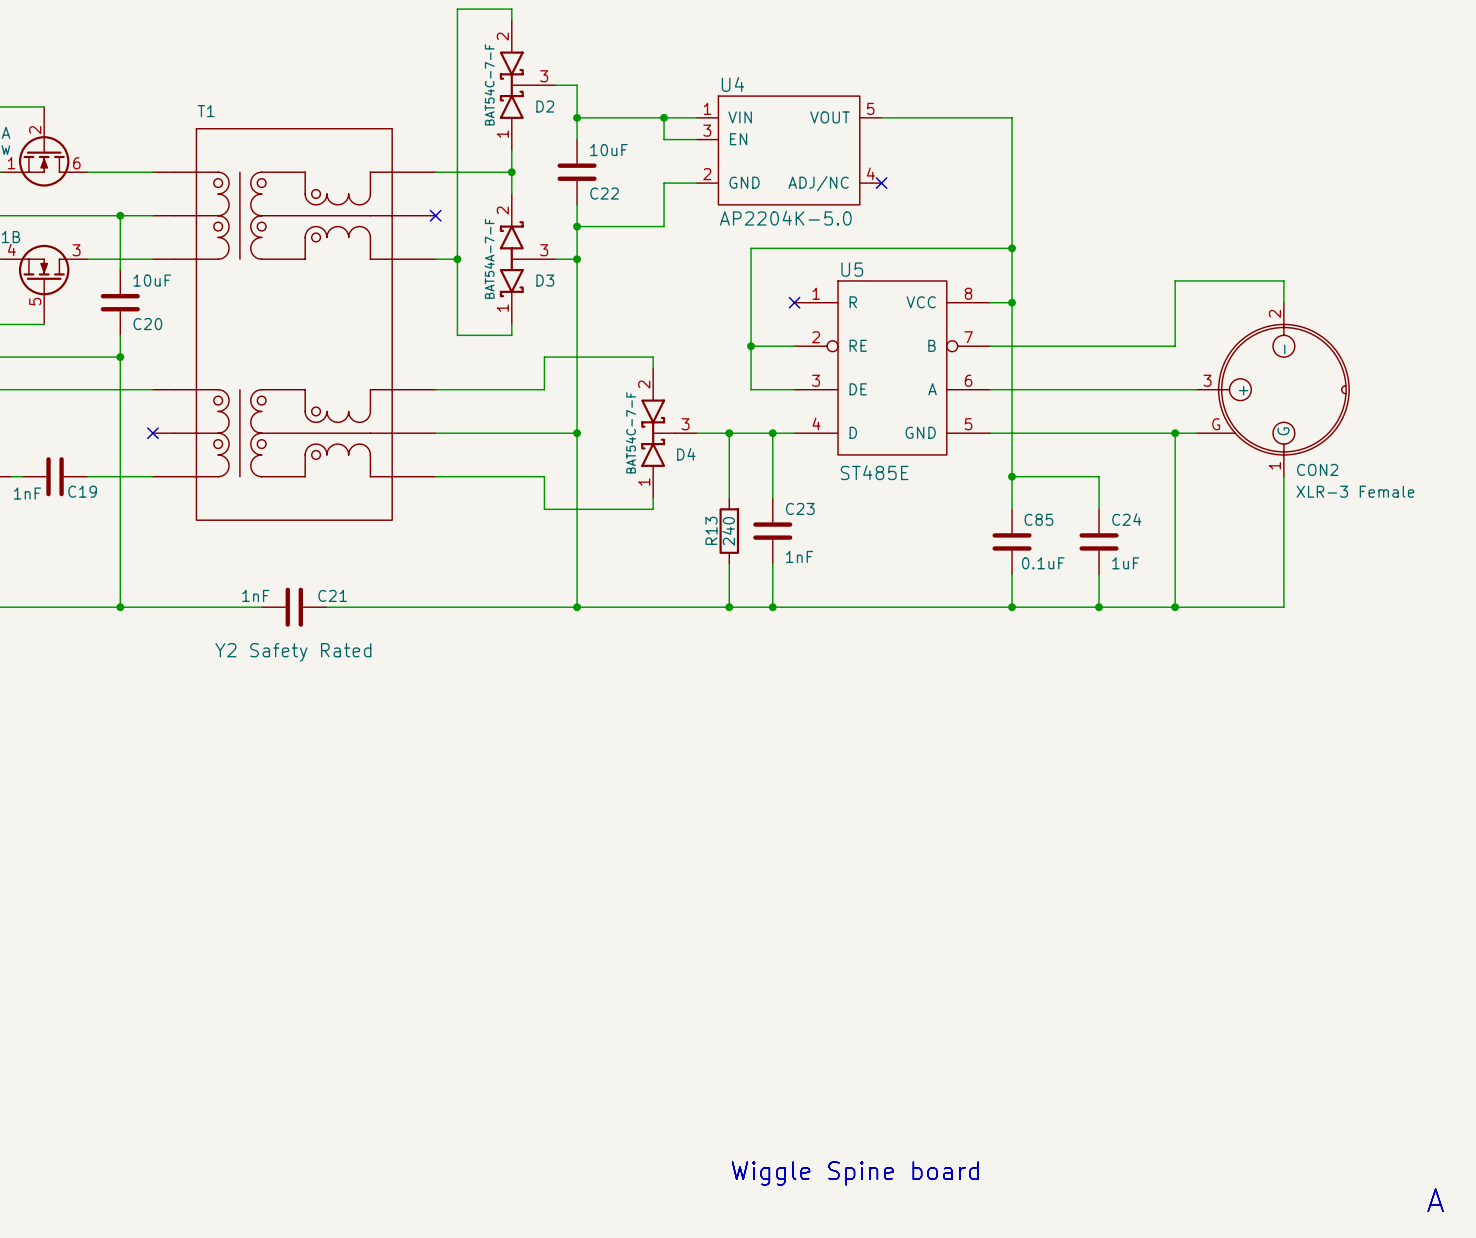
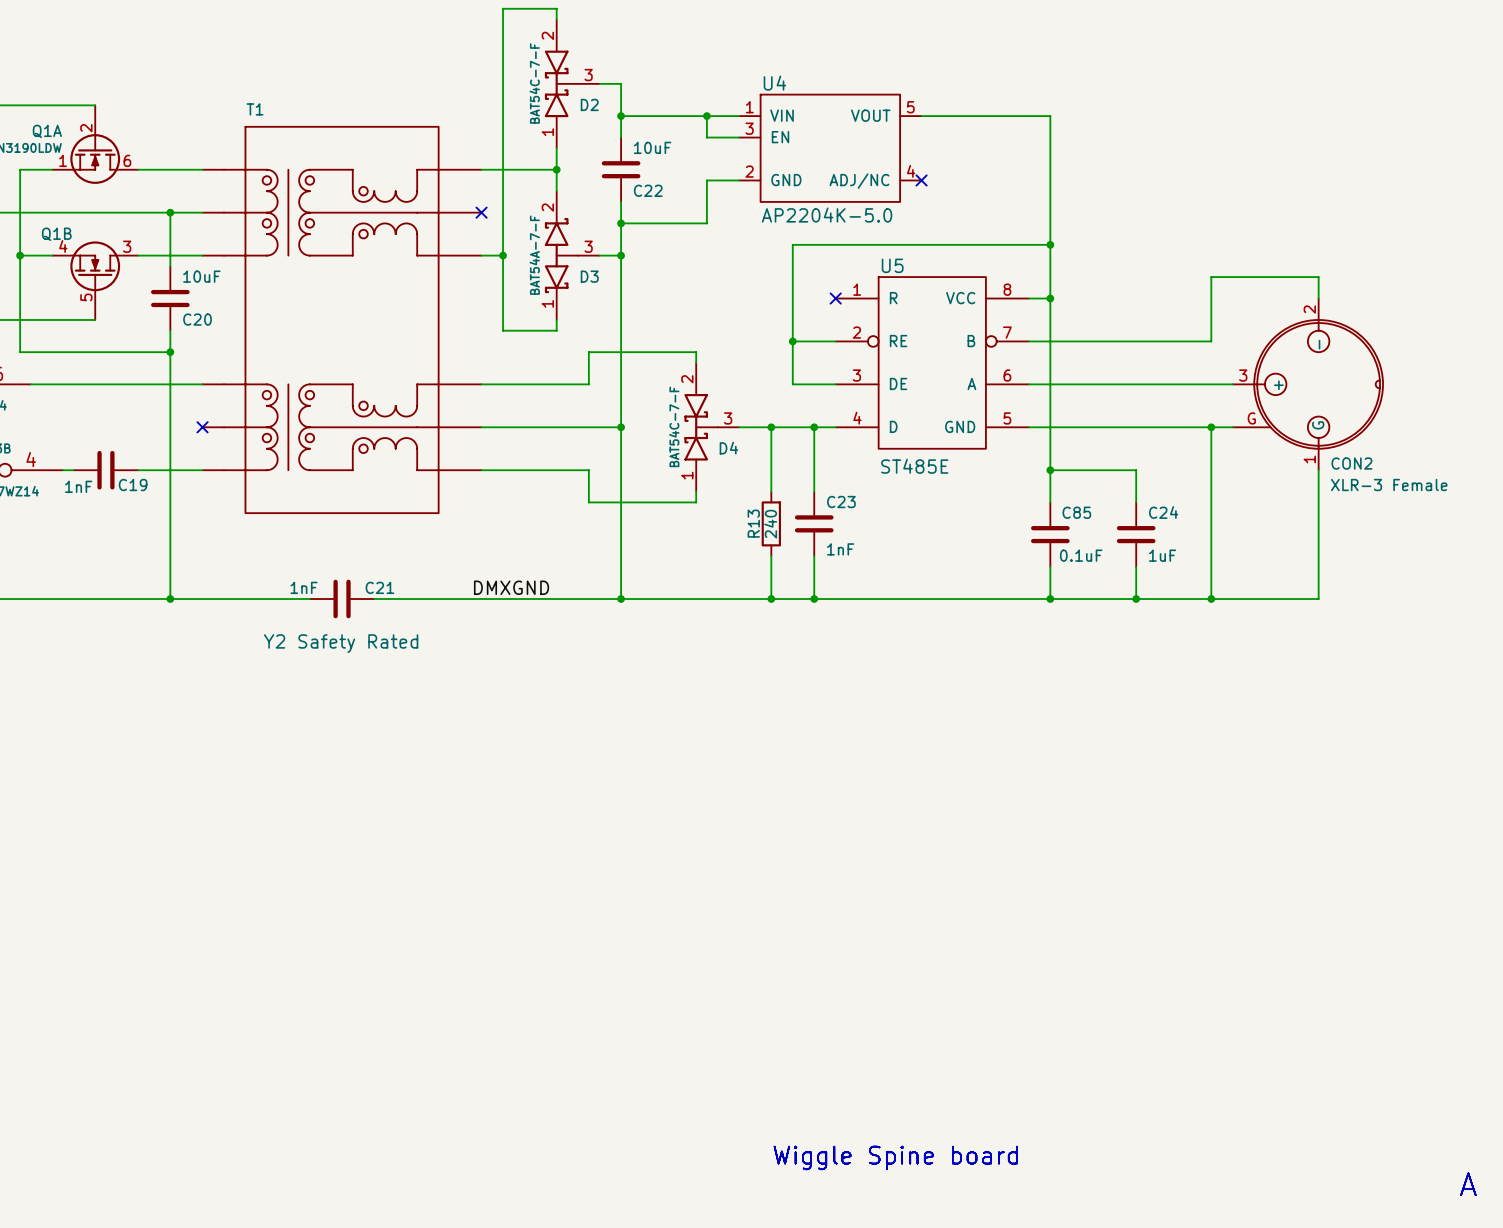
label: none -> DMXGND (511, 587)

